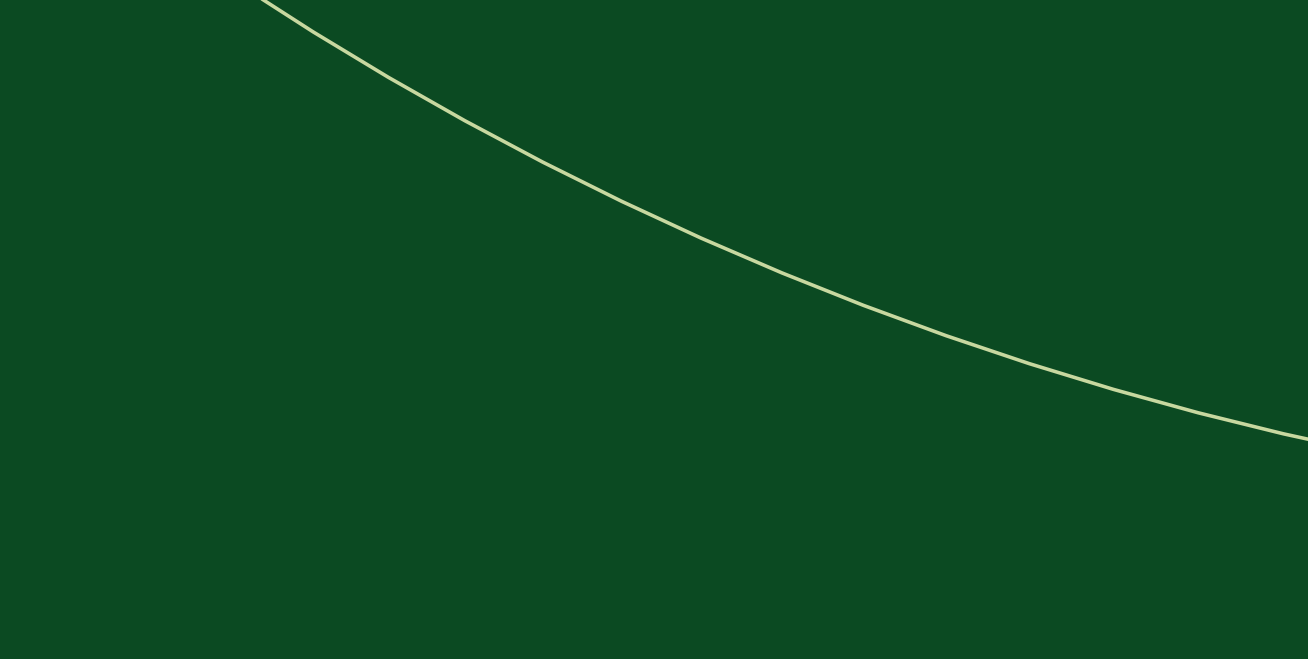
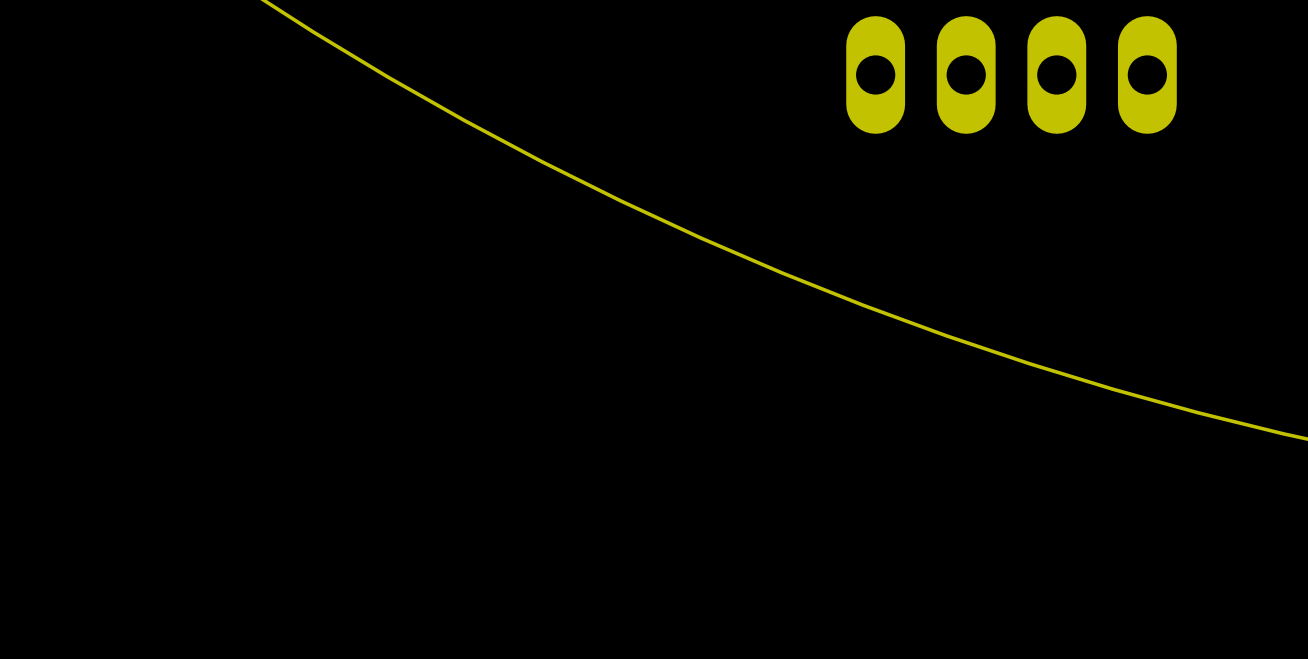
part: none -> (1011, 74)

